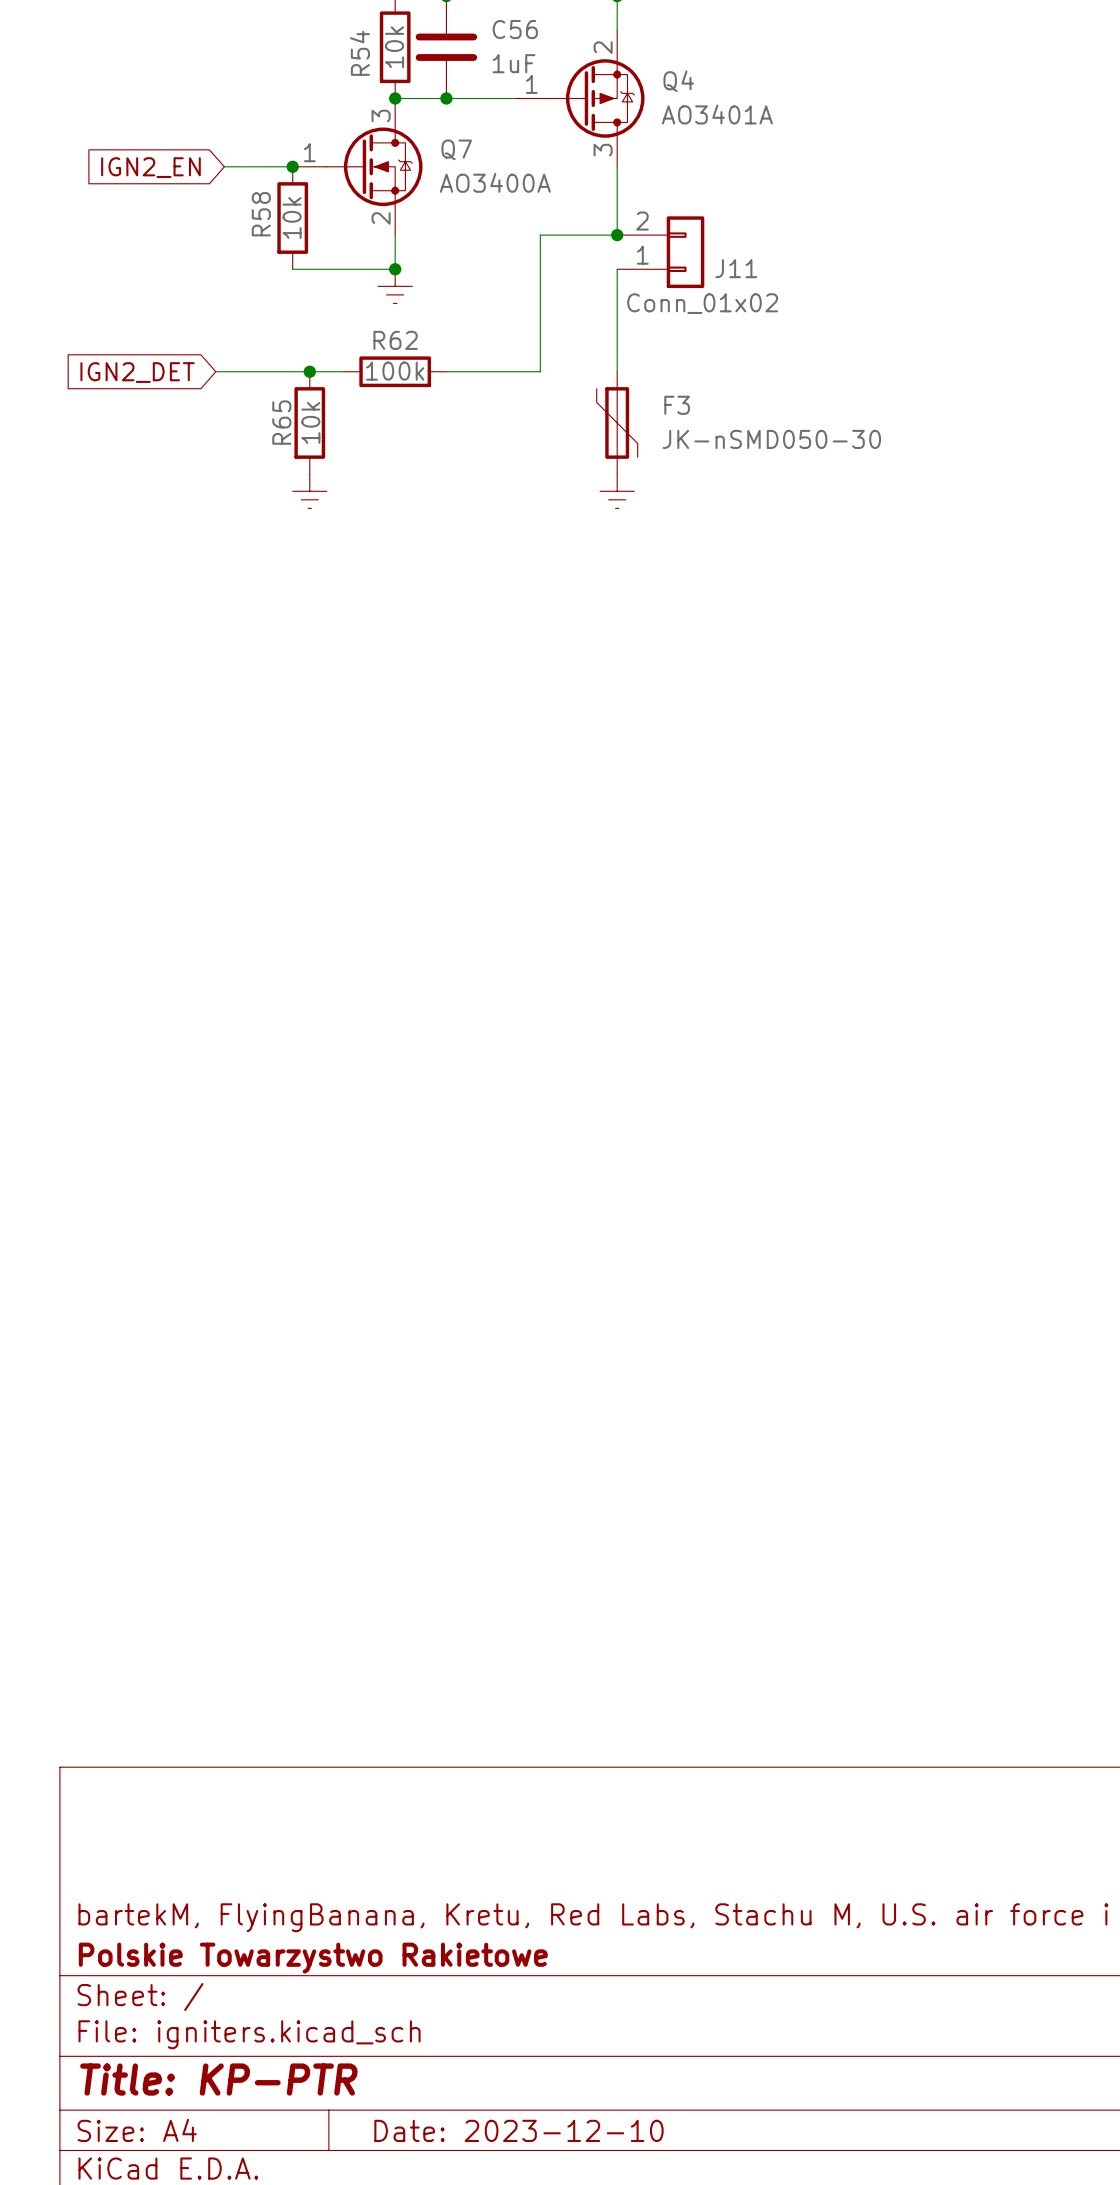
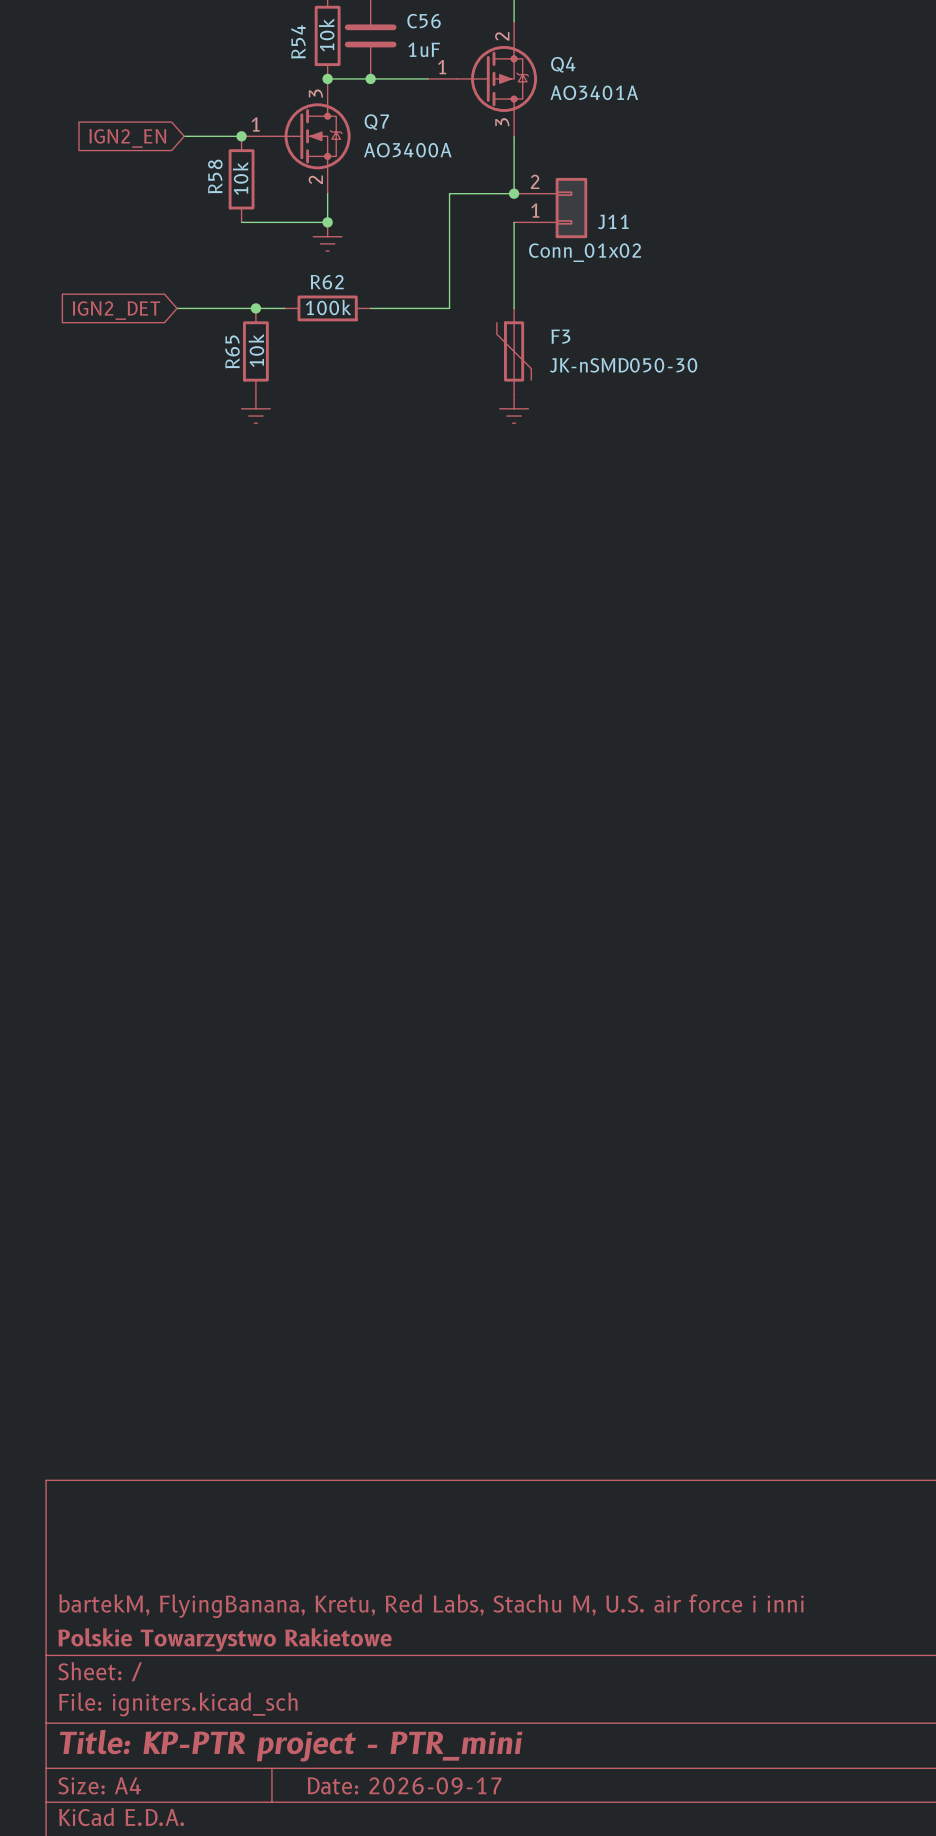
title block: Title: KP-PTR (218, 2079) -> Title: KP-PTR project - PTR_mini (291, 1745)
title block: Date: 2023-12-10 (518, 2130) -> Date: 2026-09-17 (404, 1785)

